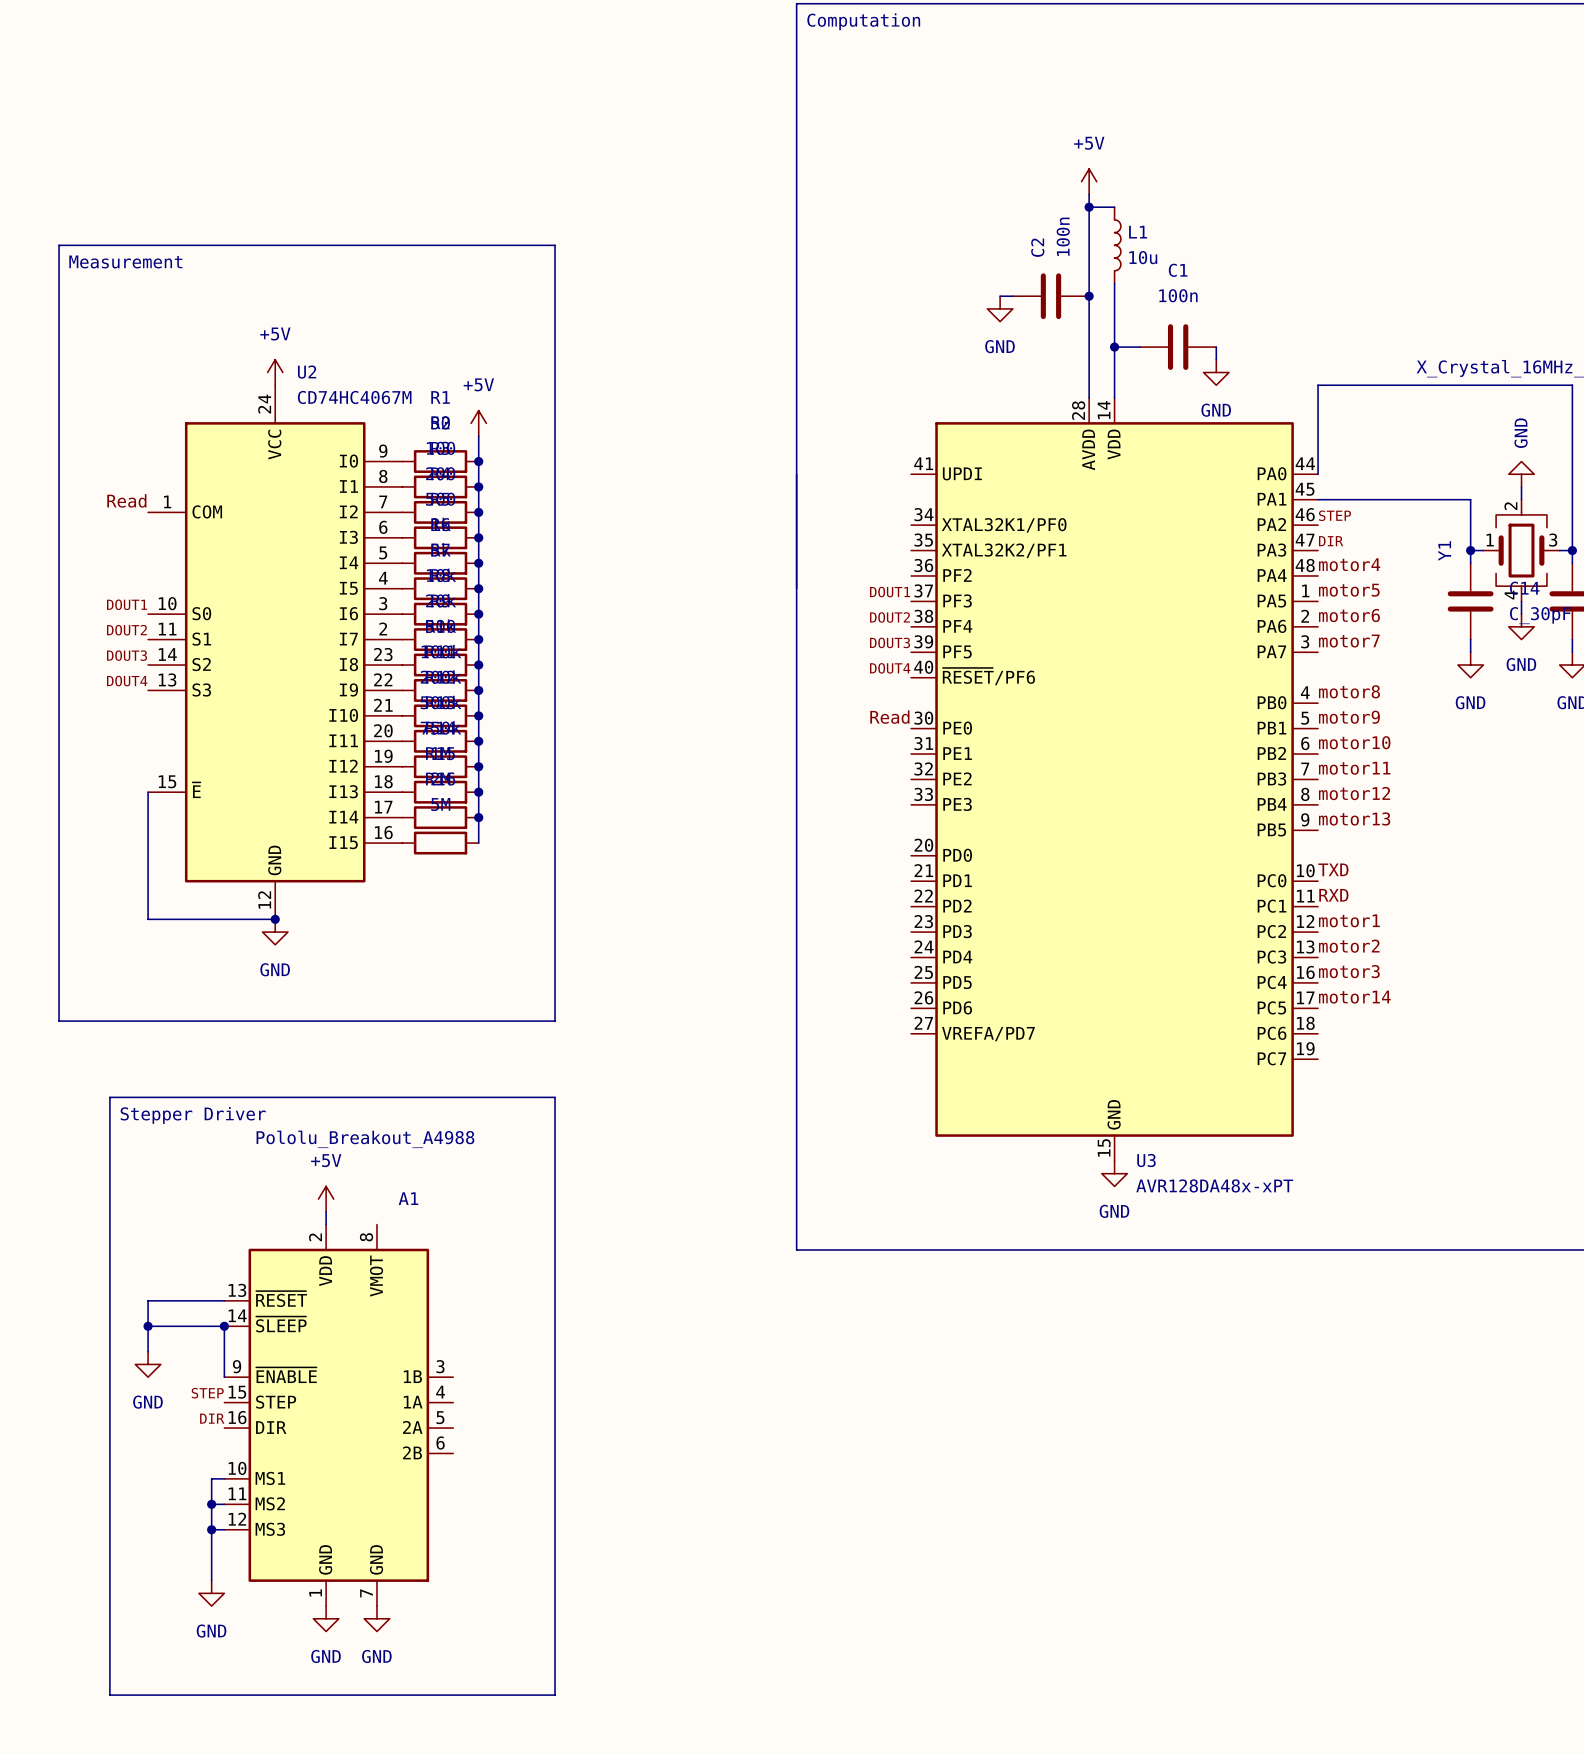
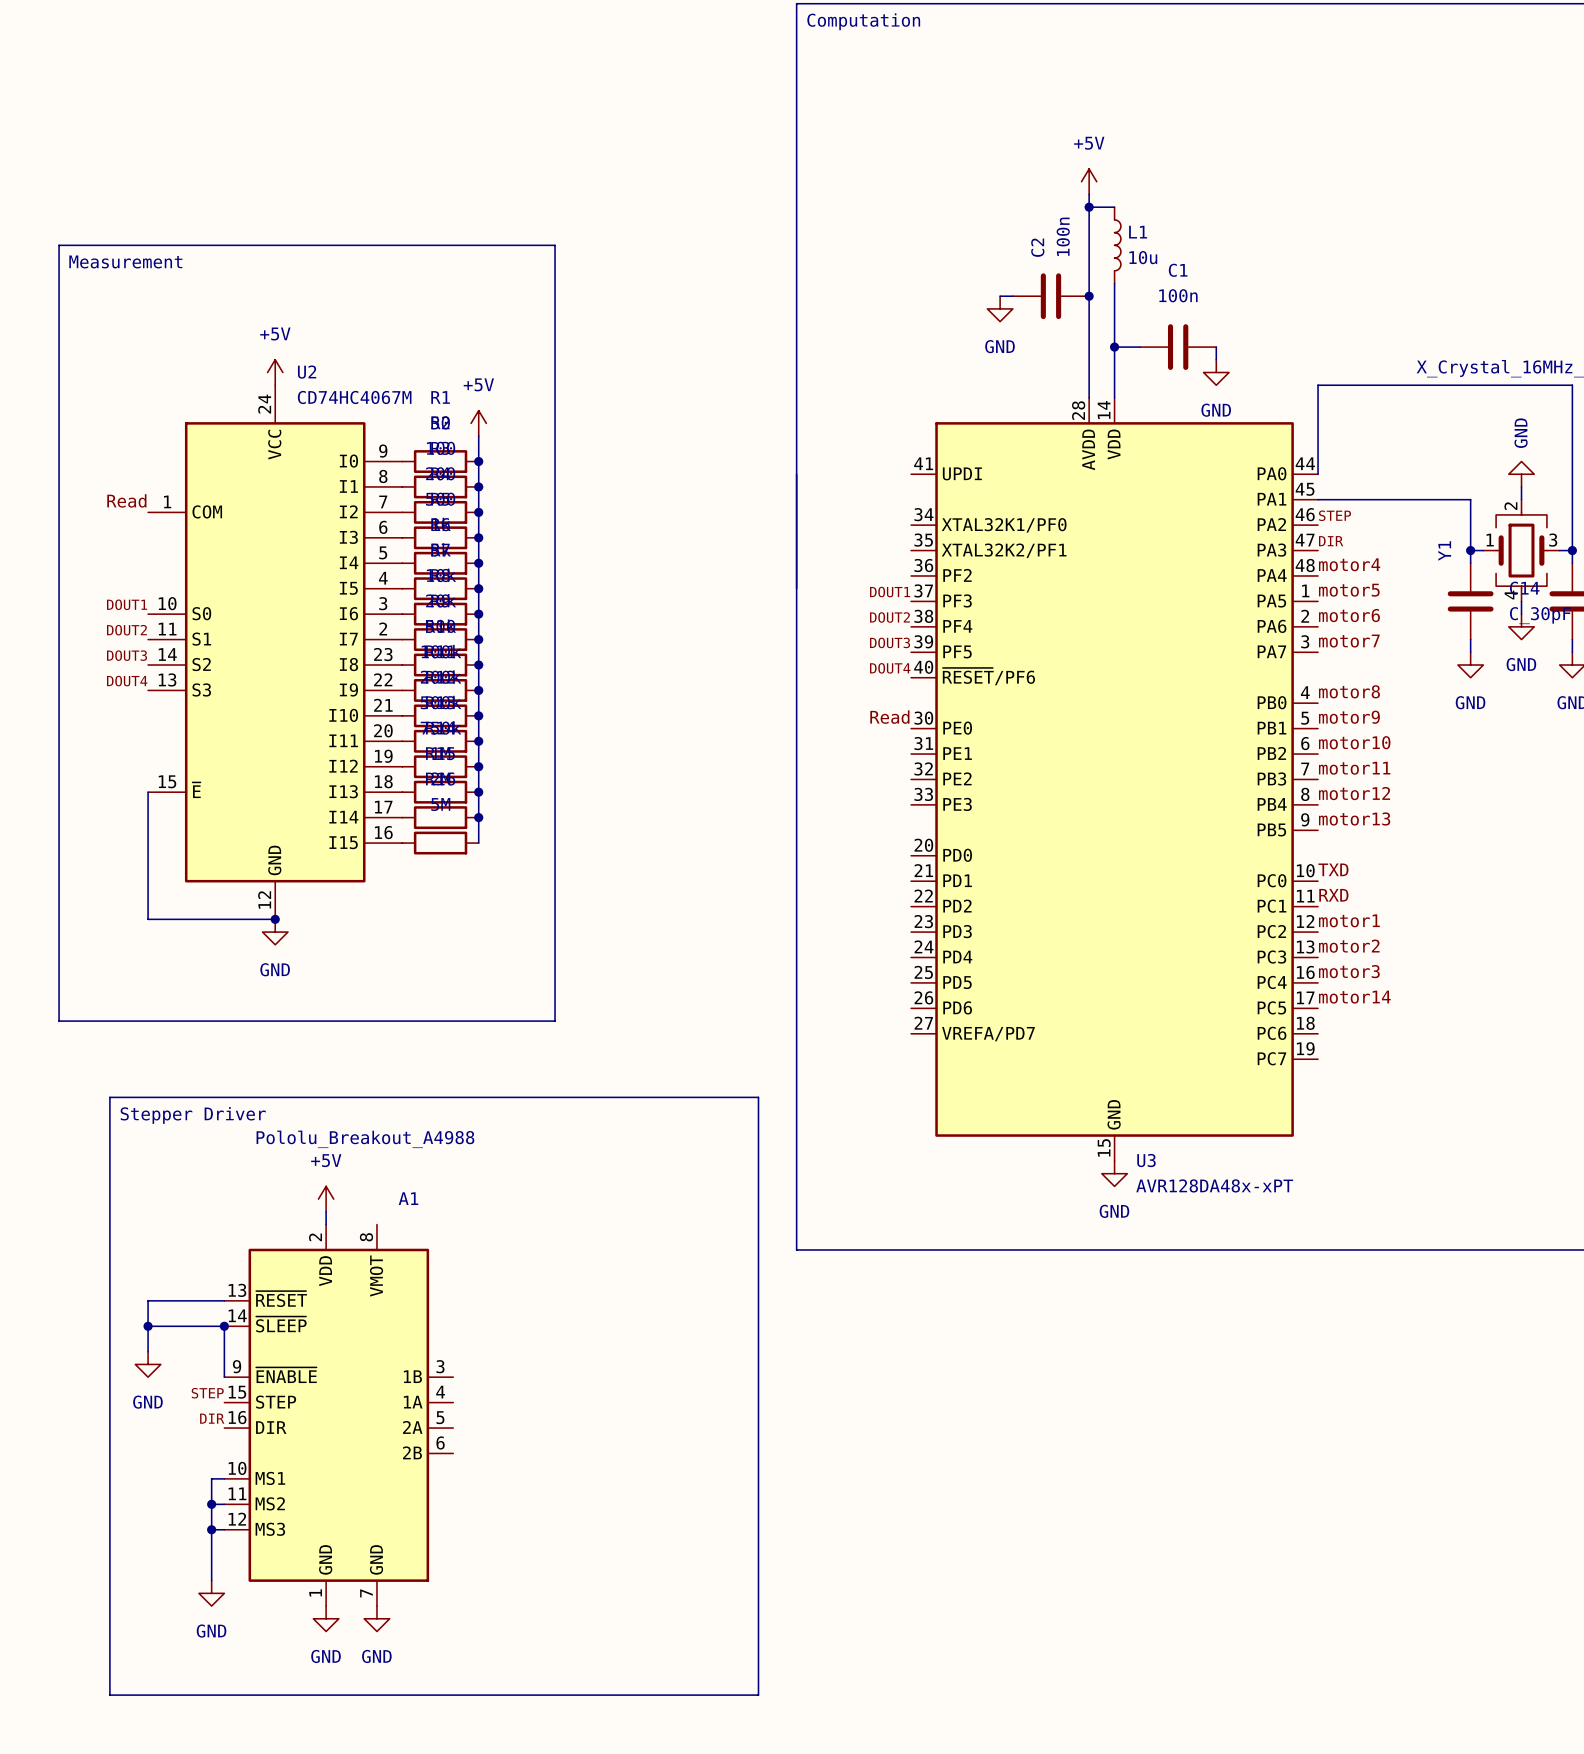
line: (555, 1097) (555, 1695) -> (555, 1097) (758, 1097) (758, 1695) (555, 1695)

